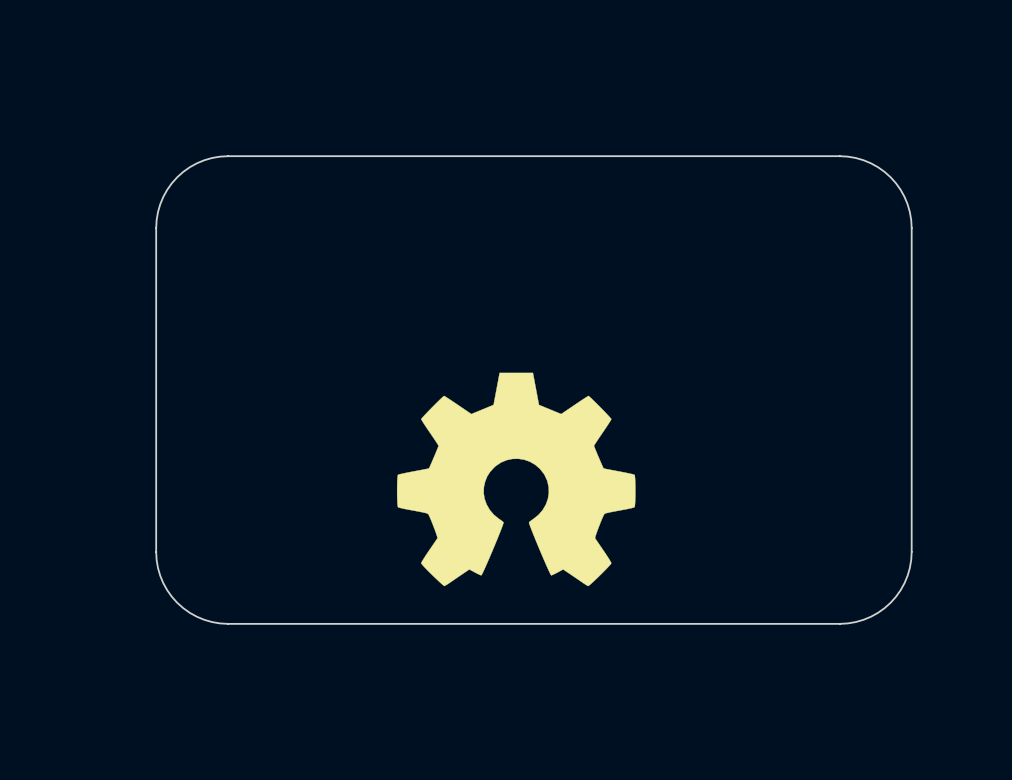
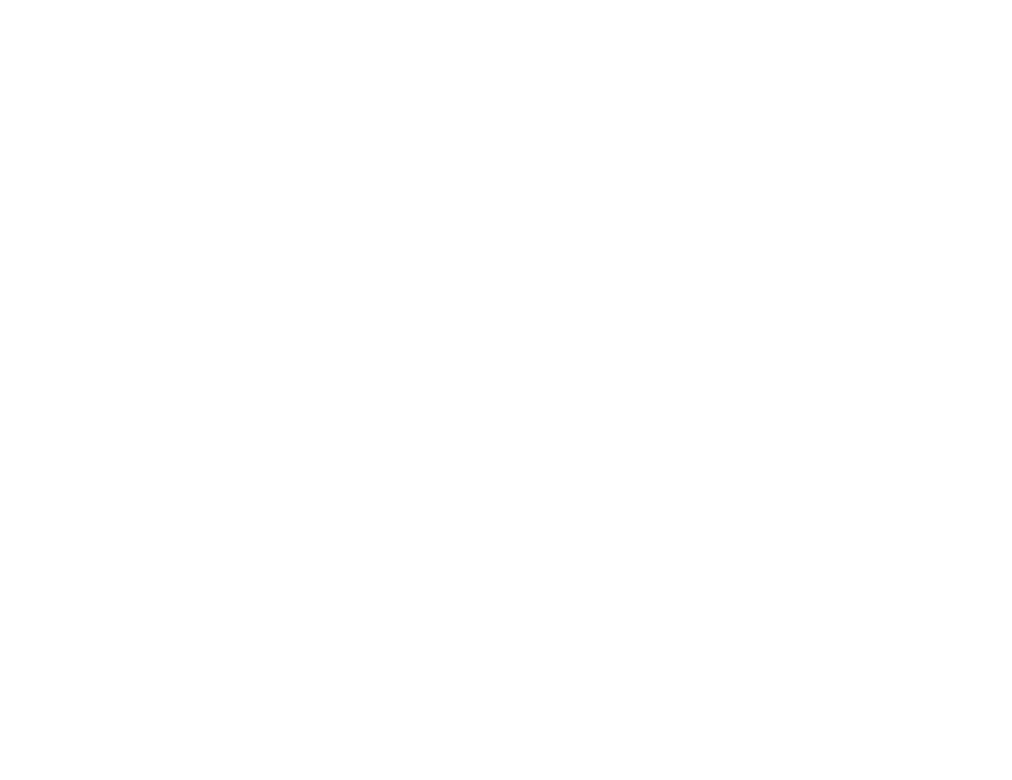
board edge: (228, 156) (839, 156) (855, 157) (878, 167) (890, 177) (900, 189) (907, 204) (911, 228) (911, 551) (907, 575) (900, 590) (890, 602) (870, 616) (855, 622) (839, 623) (228, 623) (204, 619) (189, 612) (177, 602) (167, 590) (160, 575) (156, 559) (156, 220) (163, 196) (177, 177) (196, 163) (212, 157) (228, 156) -> none
drawing: [396, 372, 636, 587] -> none

